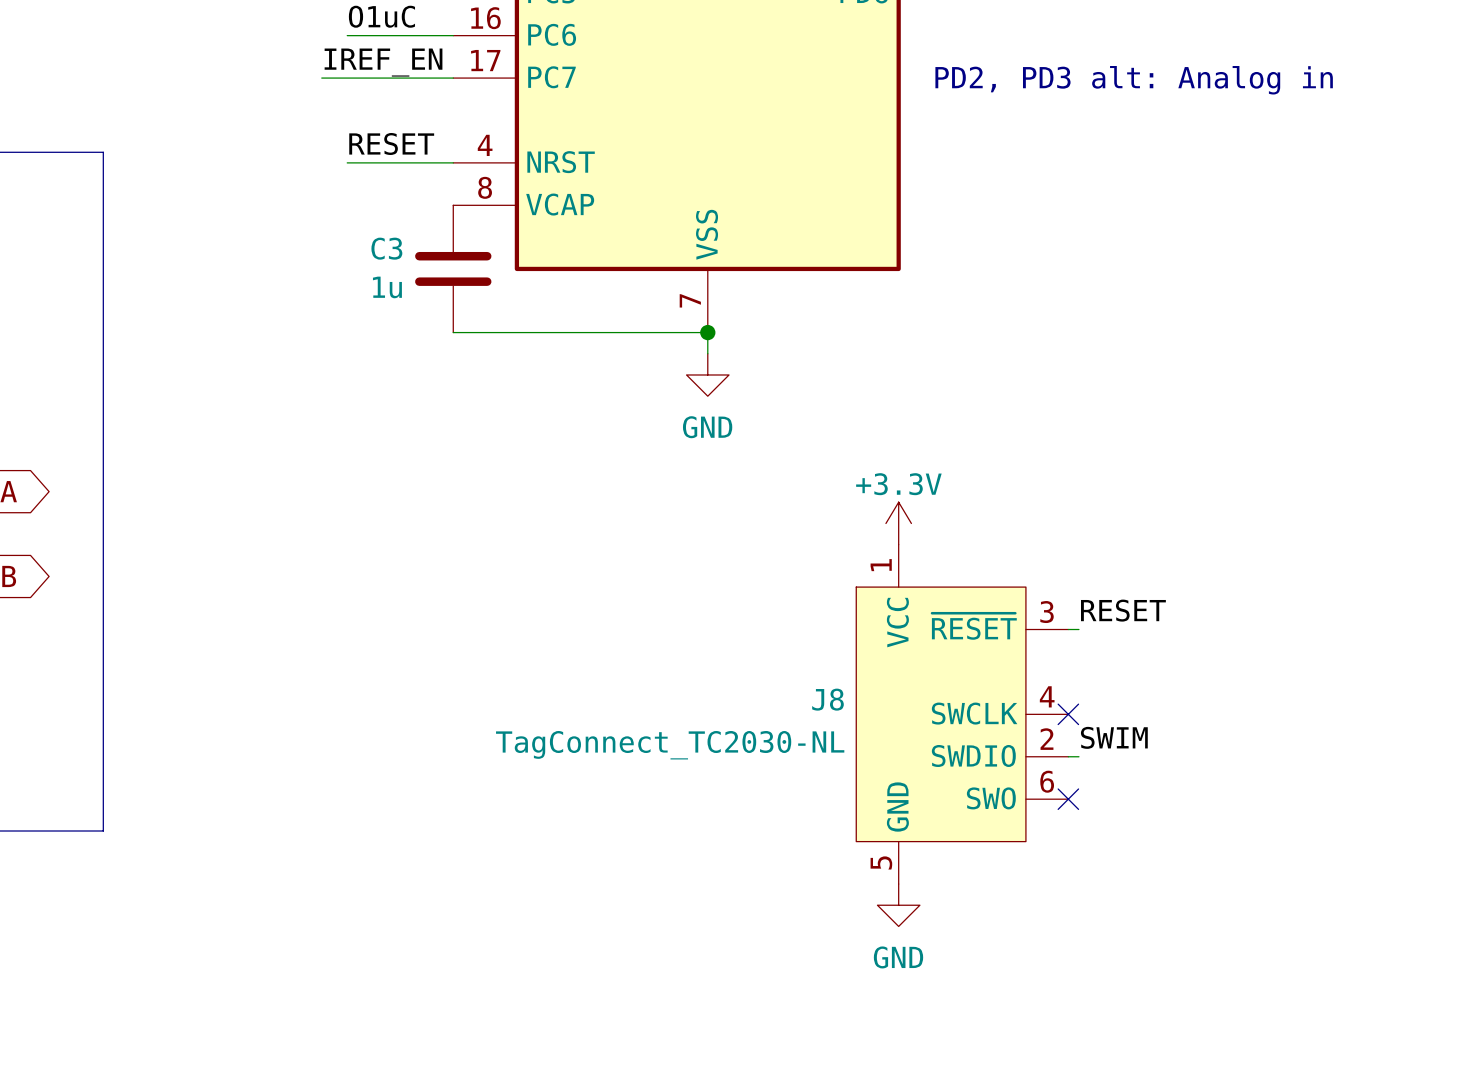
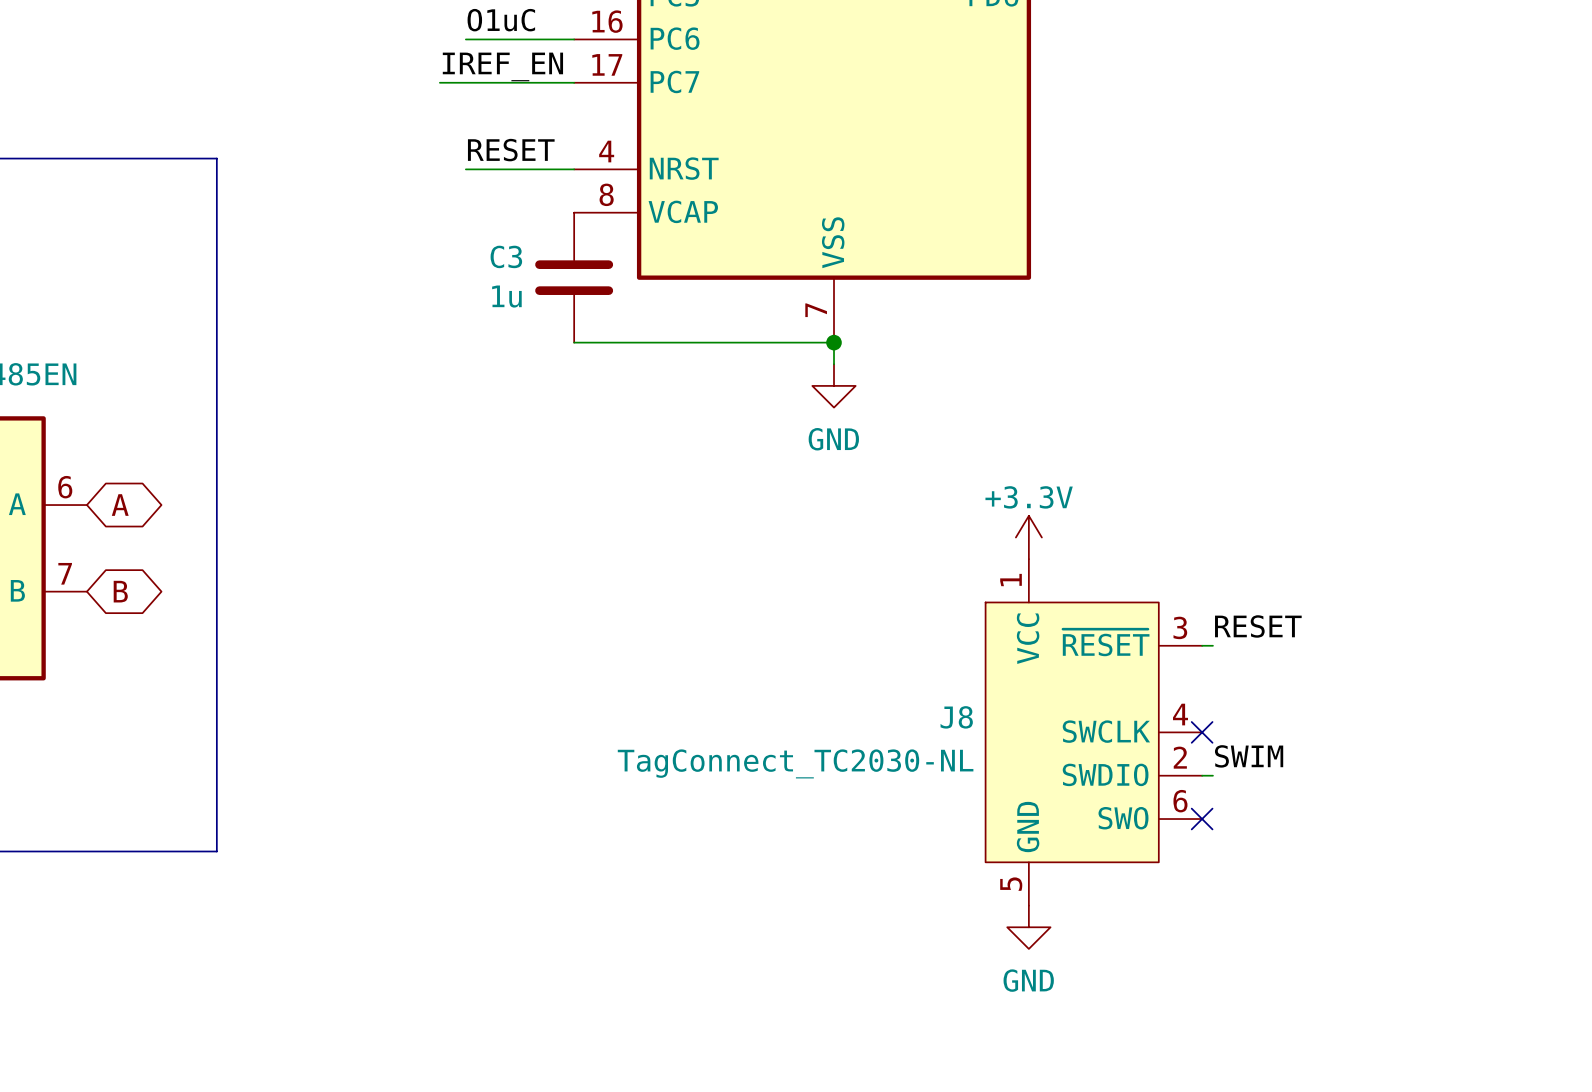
text: PD2, PD3 alt: Analog in (1134, 80) -> none

